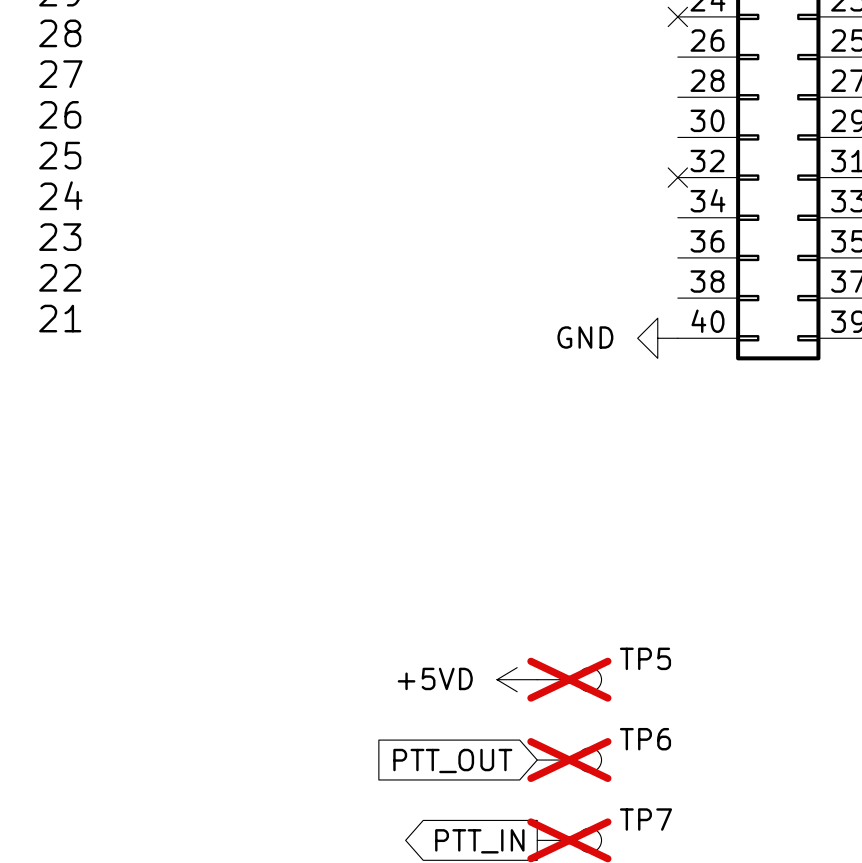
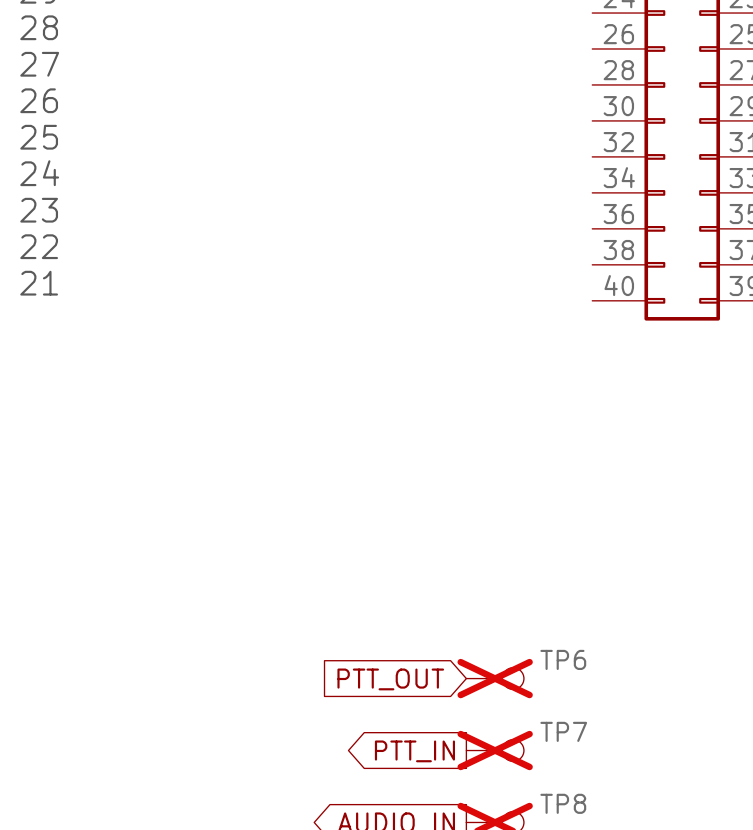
no-connect mark: (677, 16) -> none
no-connect mark: (677, 177) -> none
power symbol: GND (657, 338) -> none
power symbol: +5VD (517, 679) -> none
TP5: (569, 679) -> none

